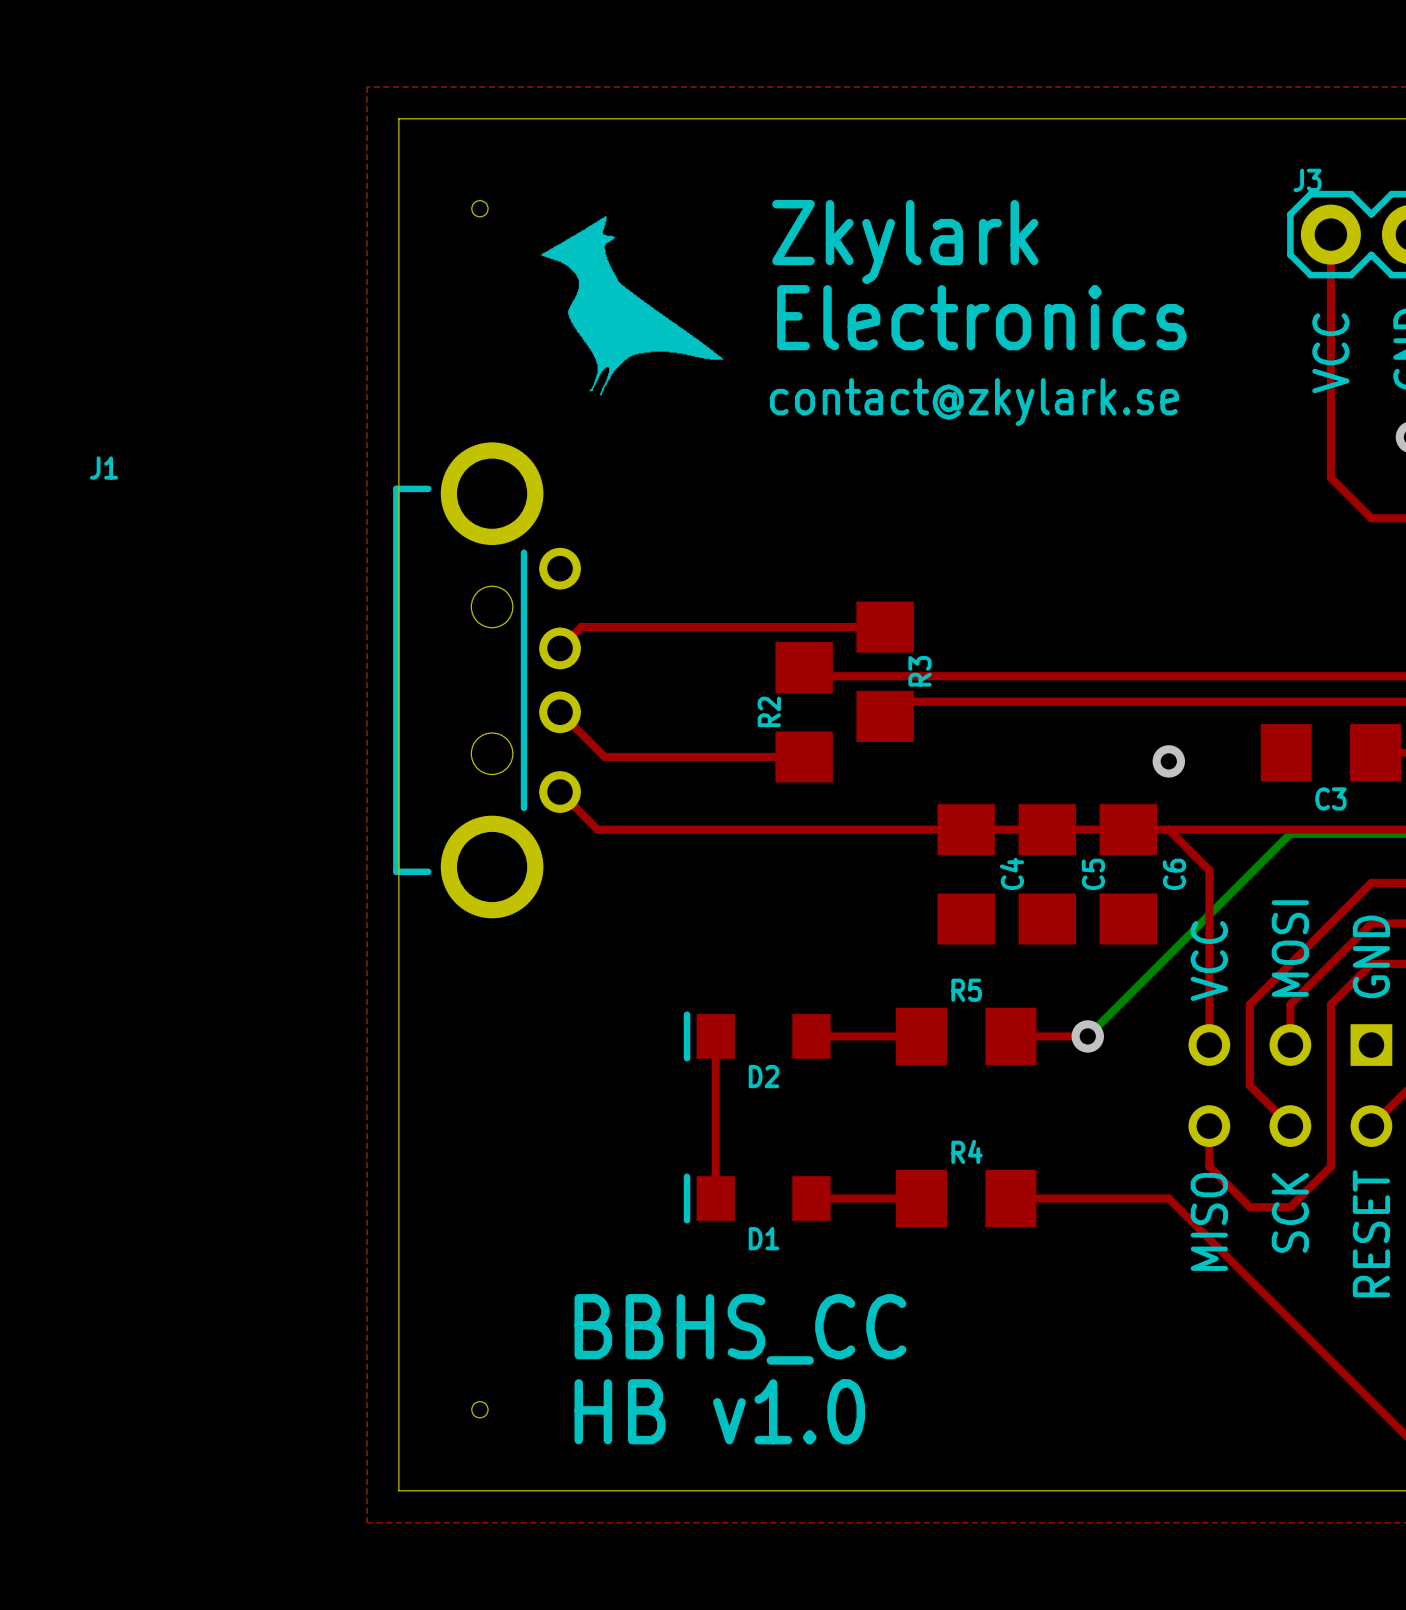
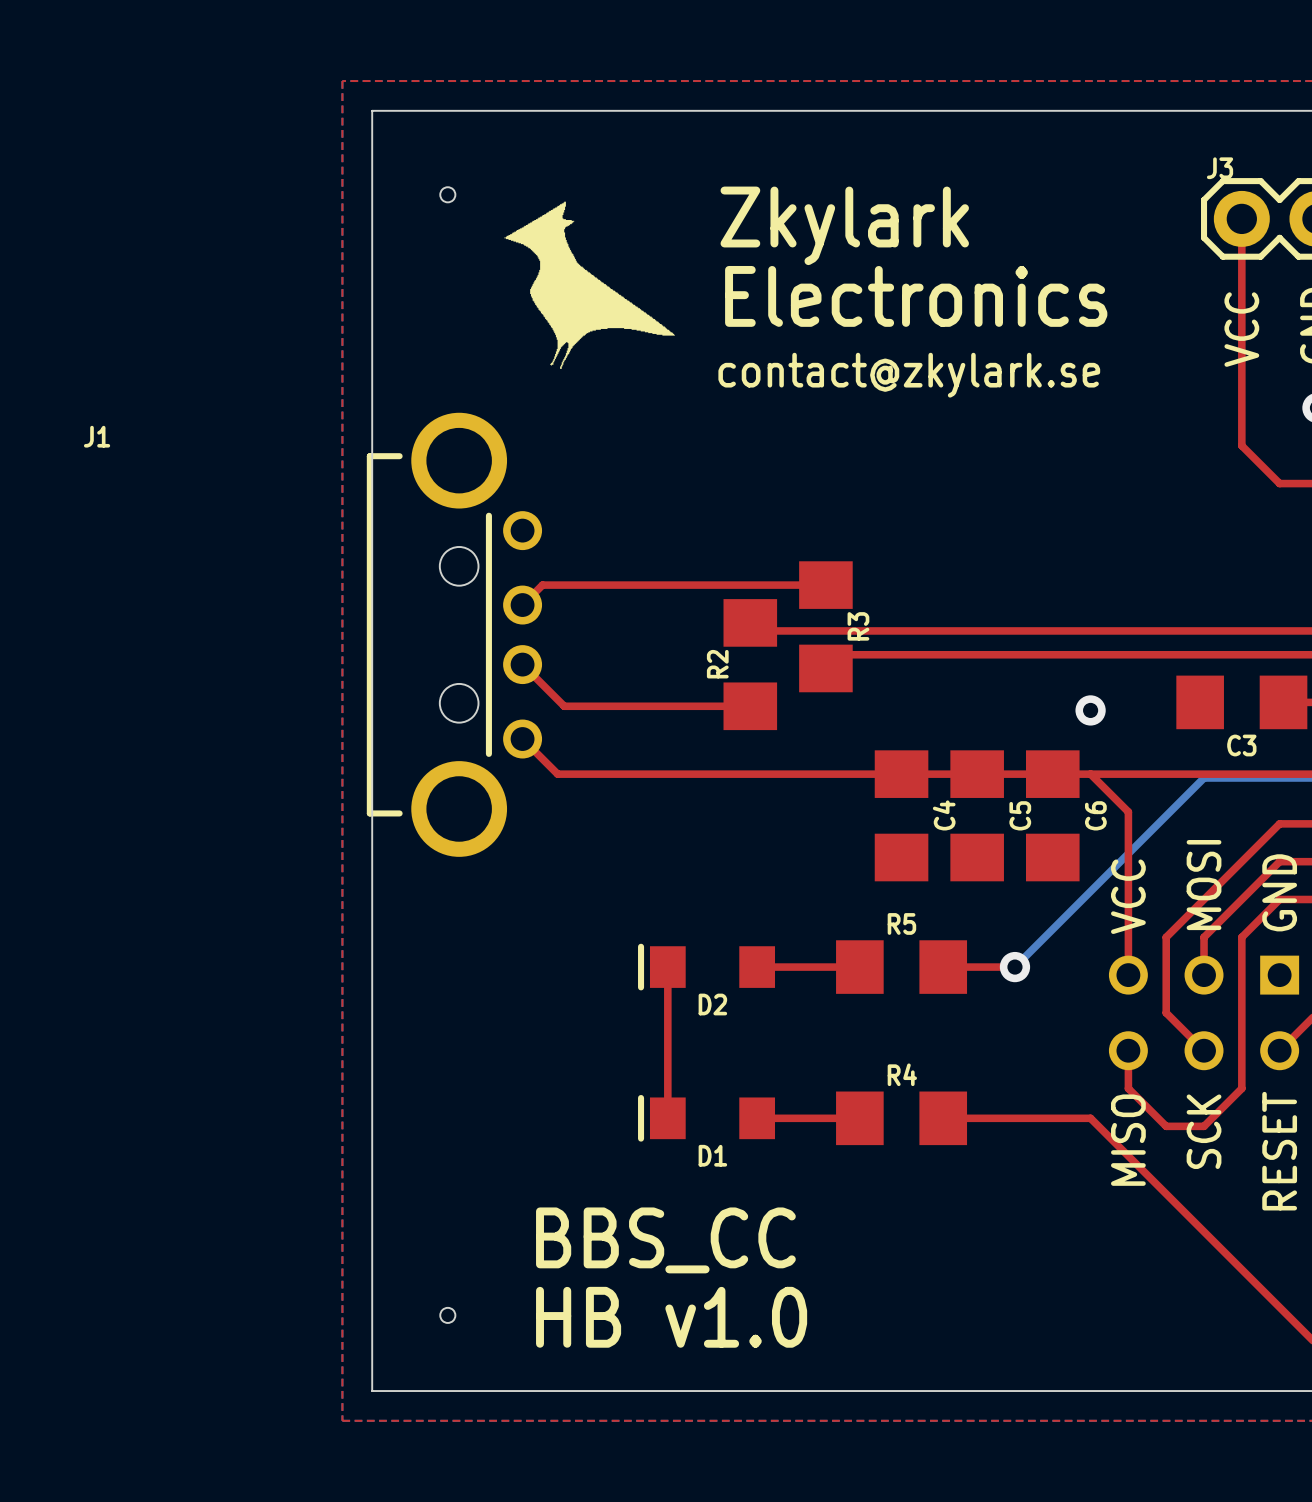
text: BBHS_CC (740, 1329) -> BBS_CC (665, 1240)

